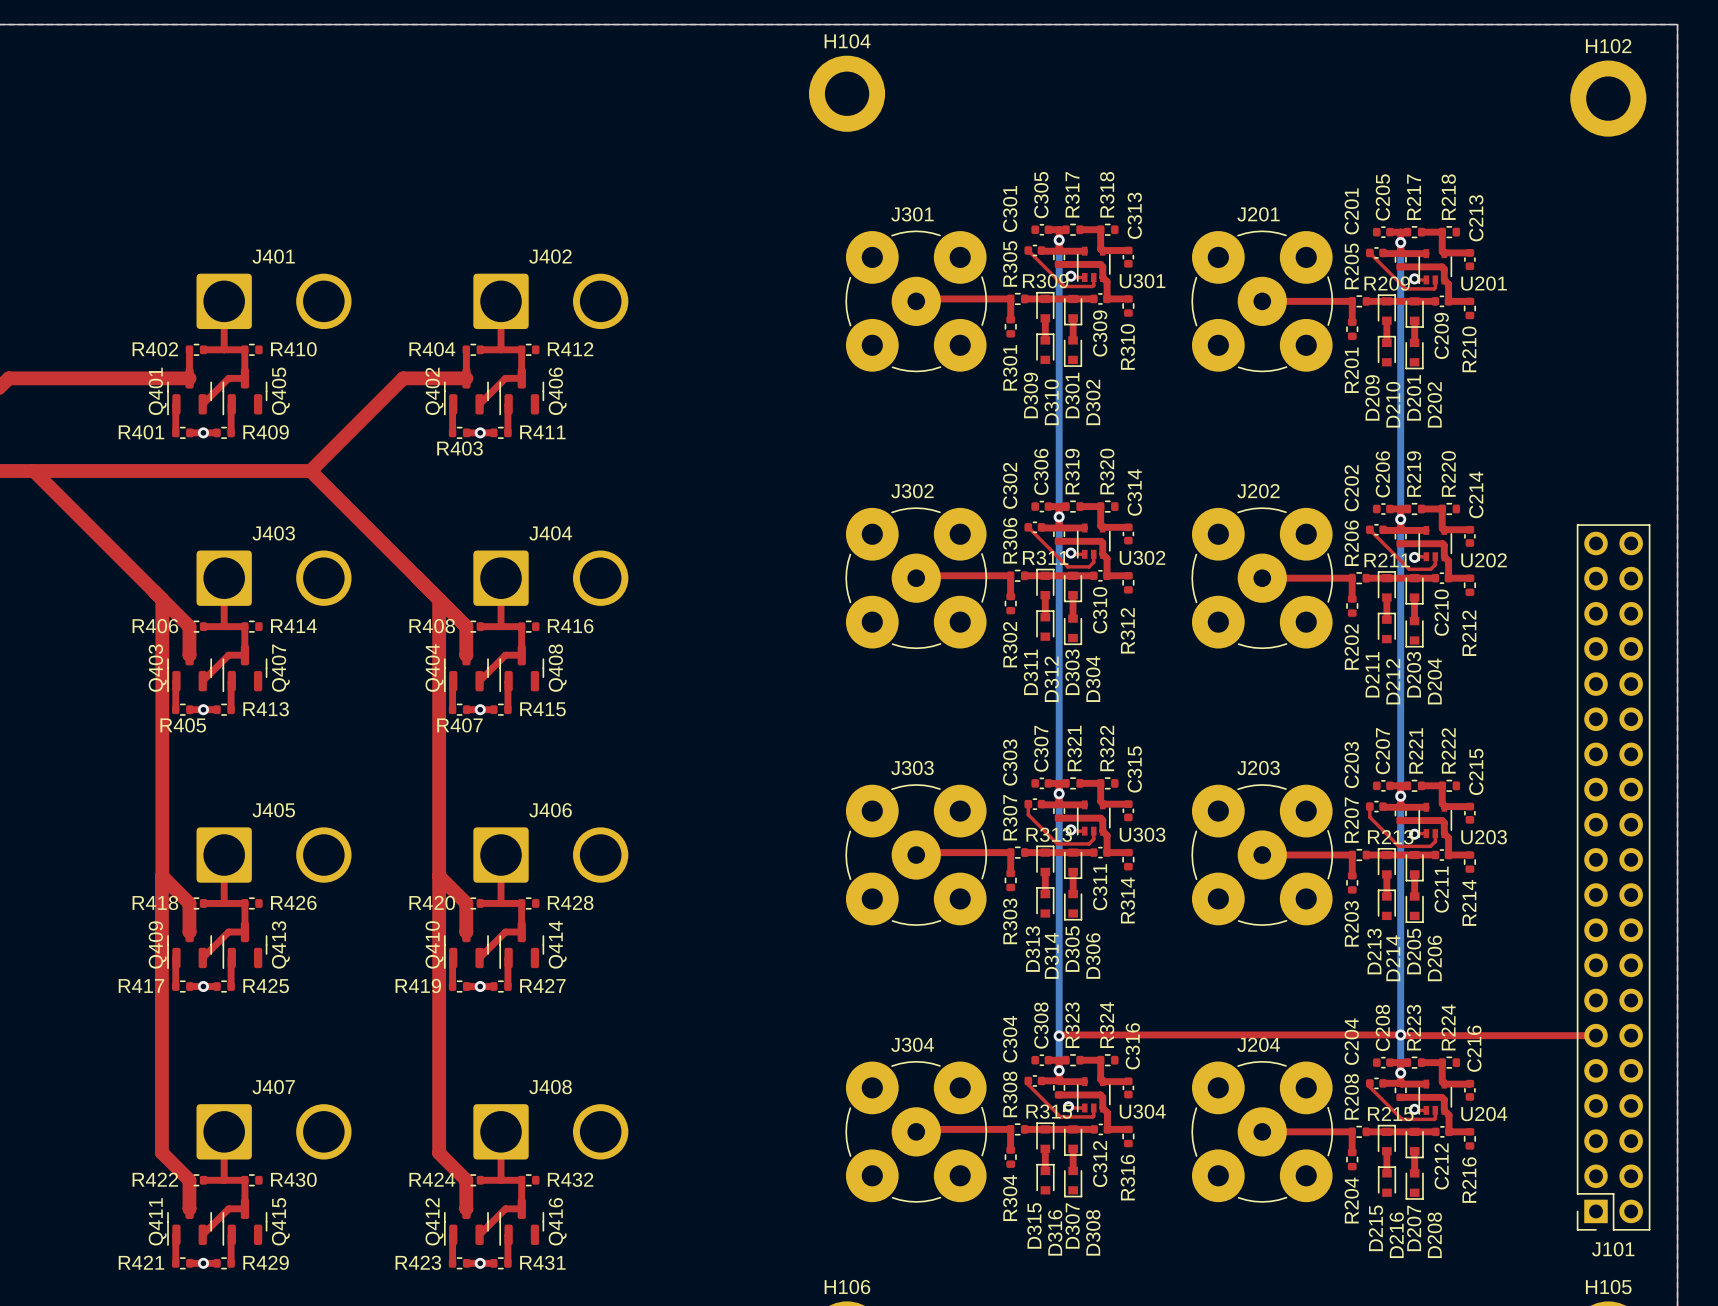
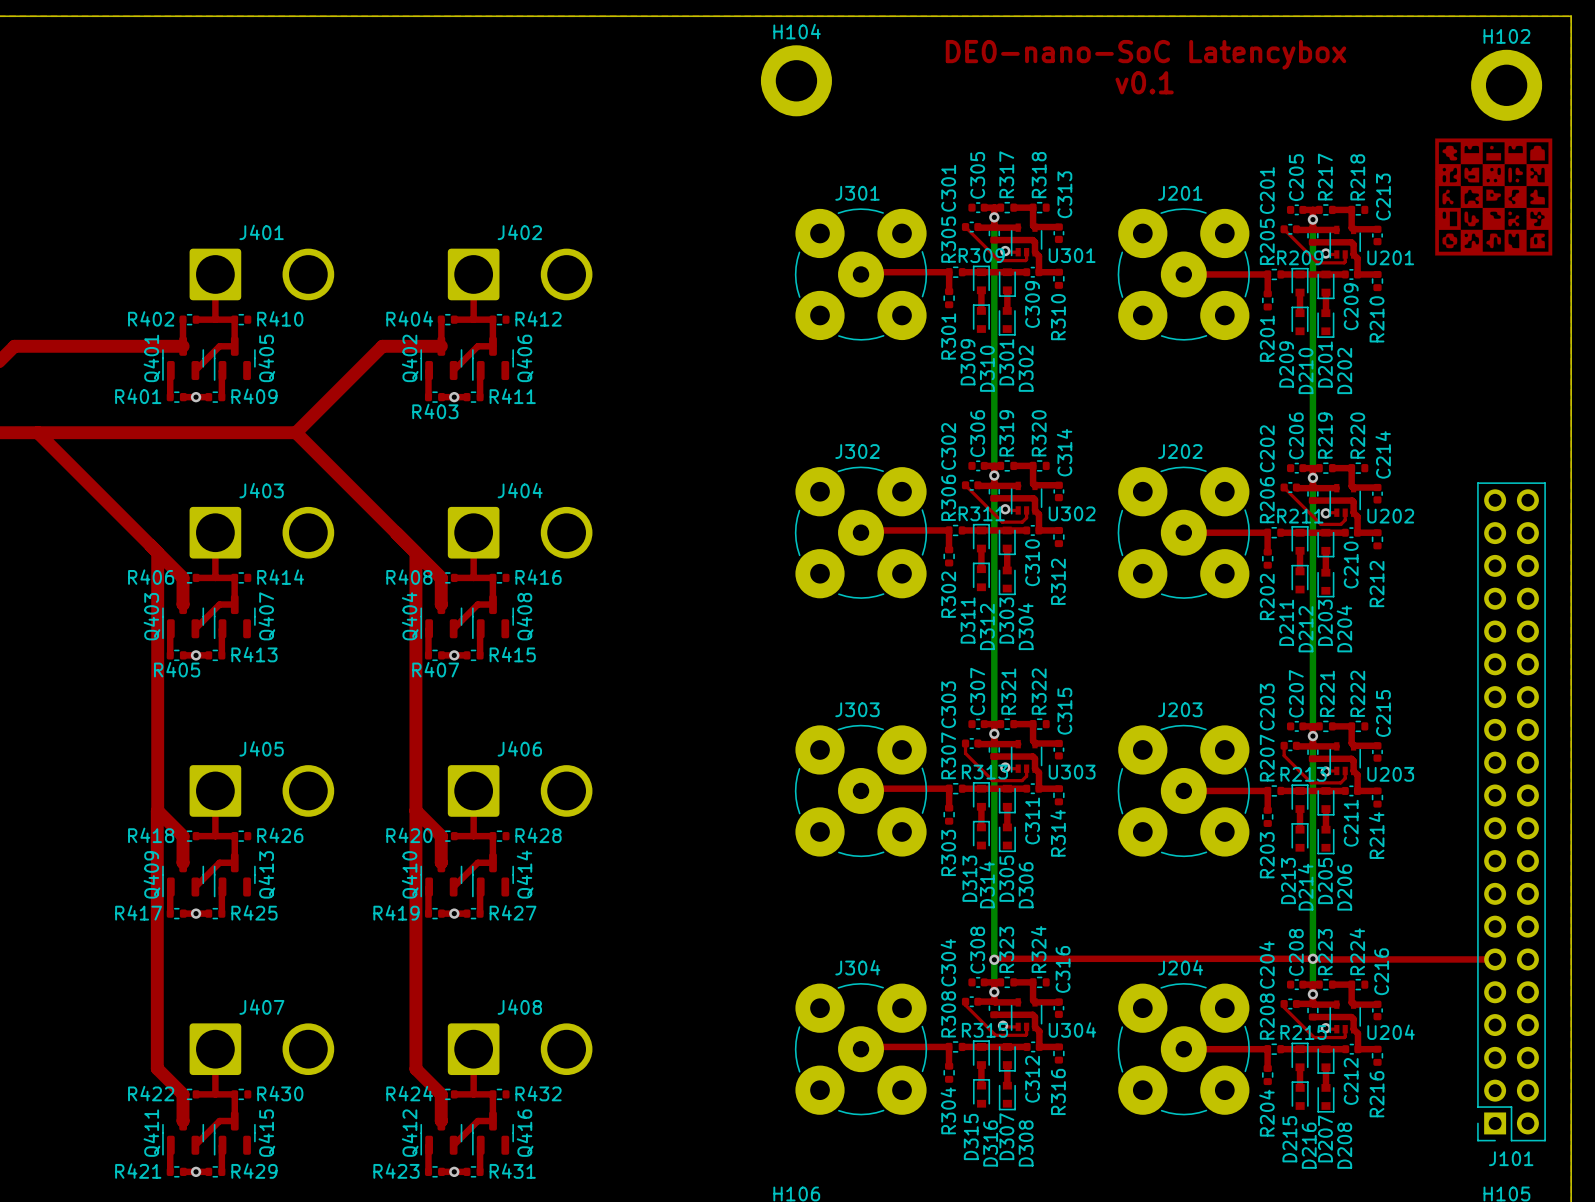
text: none -> DE0-nano-SoC Latencybox (1145, 54)
text: none -> v0.1 (1144, 82)
drawing: none -> [1435, 138, 1553, 256]

